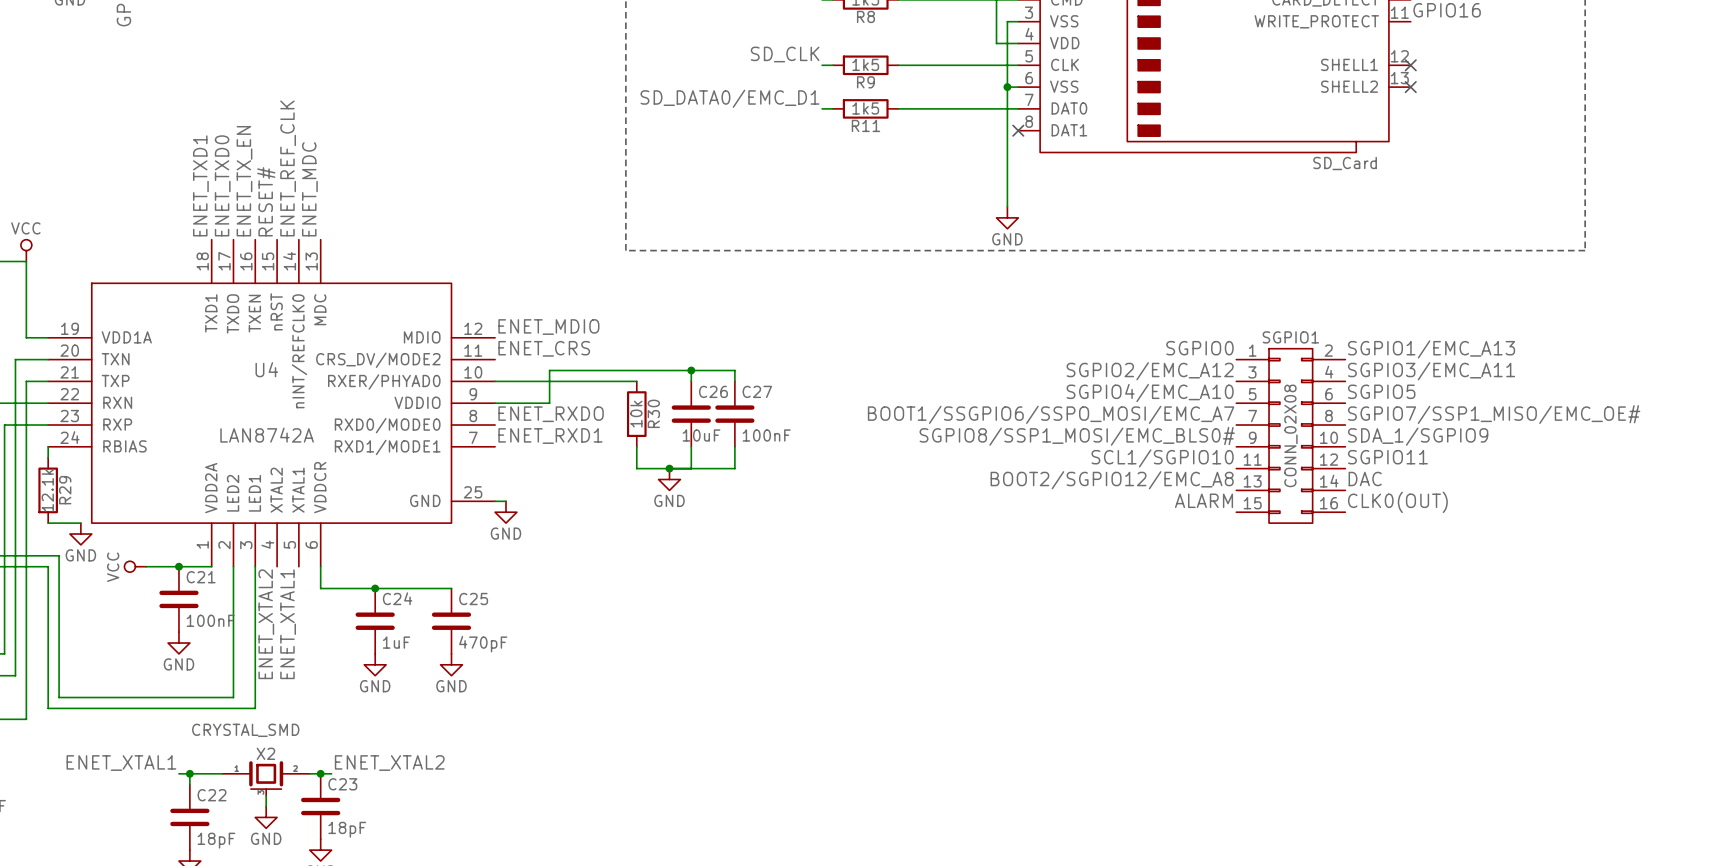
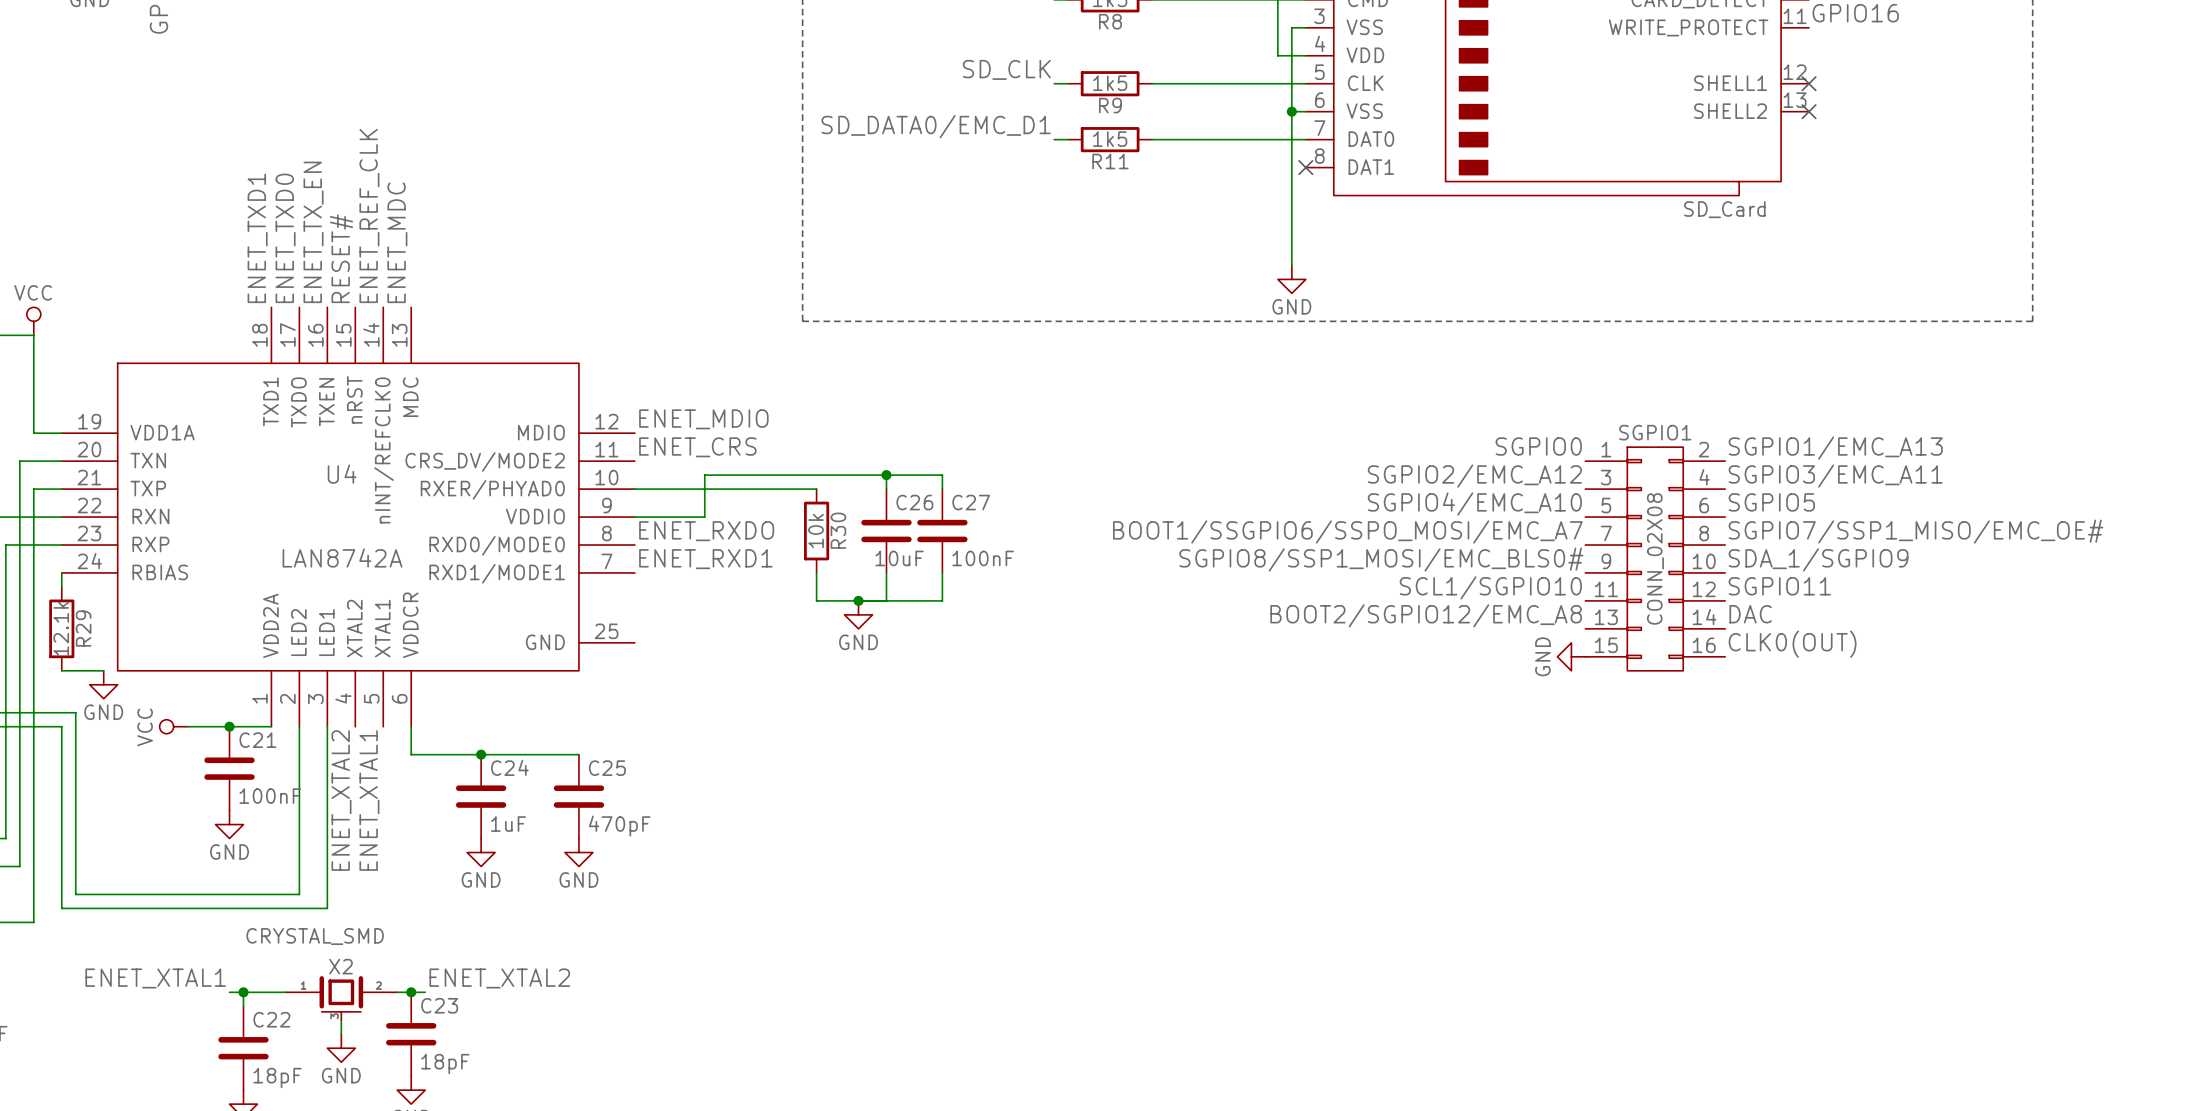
label: ALARM (1204, 500) -> none
wire: (495, 501) (505, 501) -> none
power symbol: GND (505, 512) -> none
power symbol: none -> GND (1571, 656)

